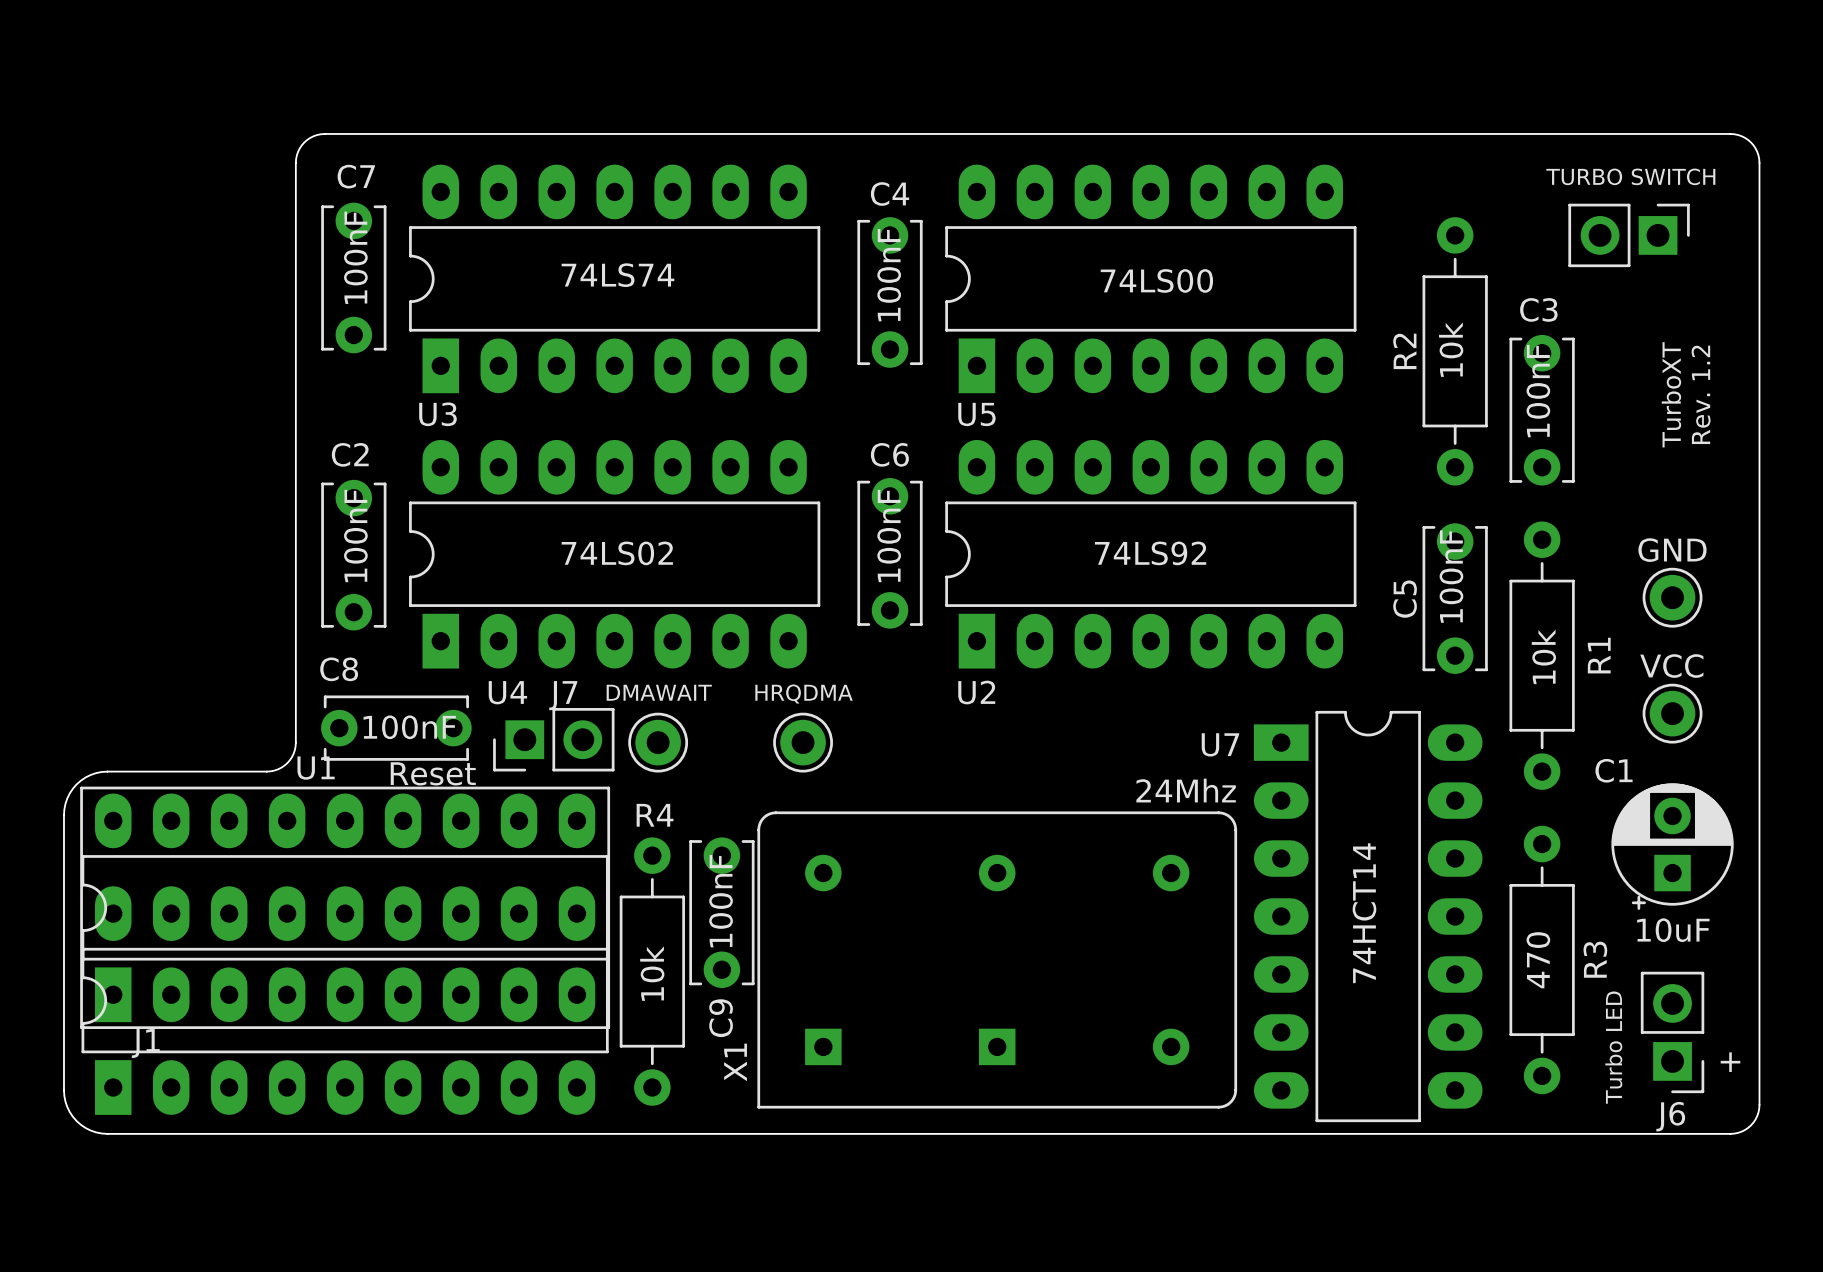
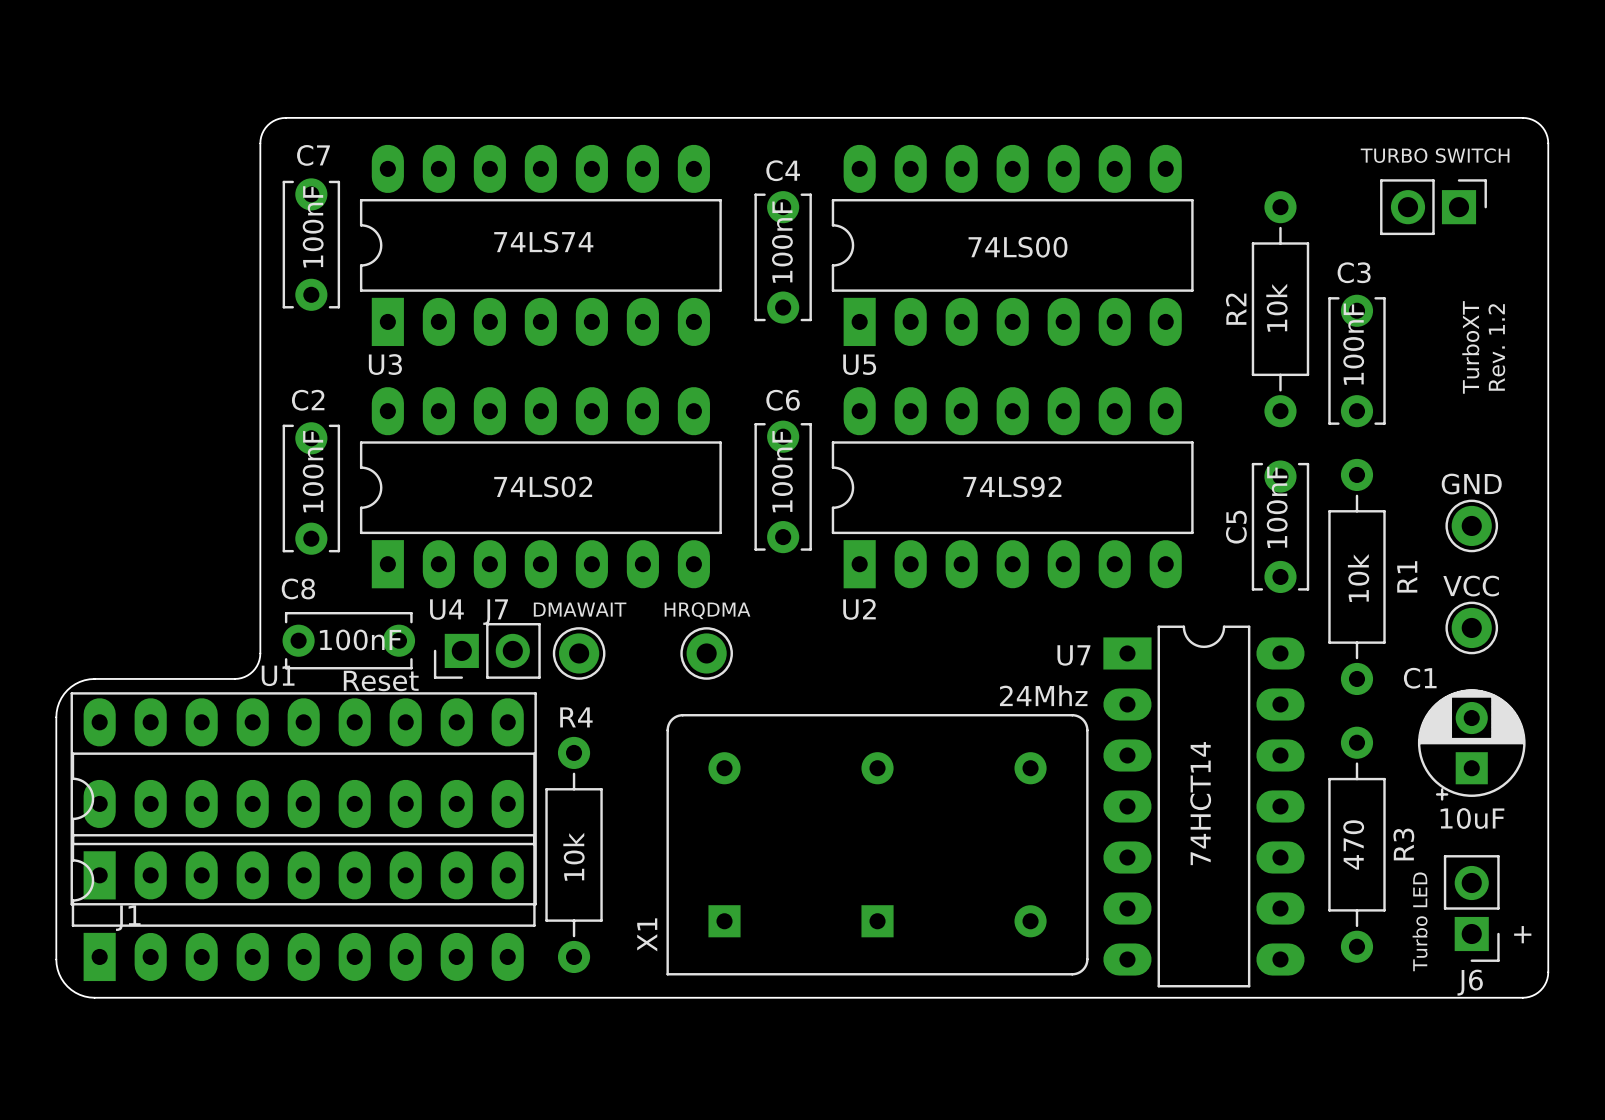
C9: 100nF (721, 912) -> none

